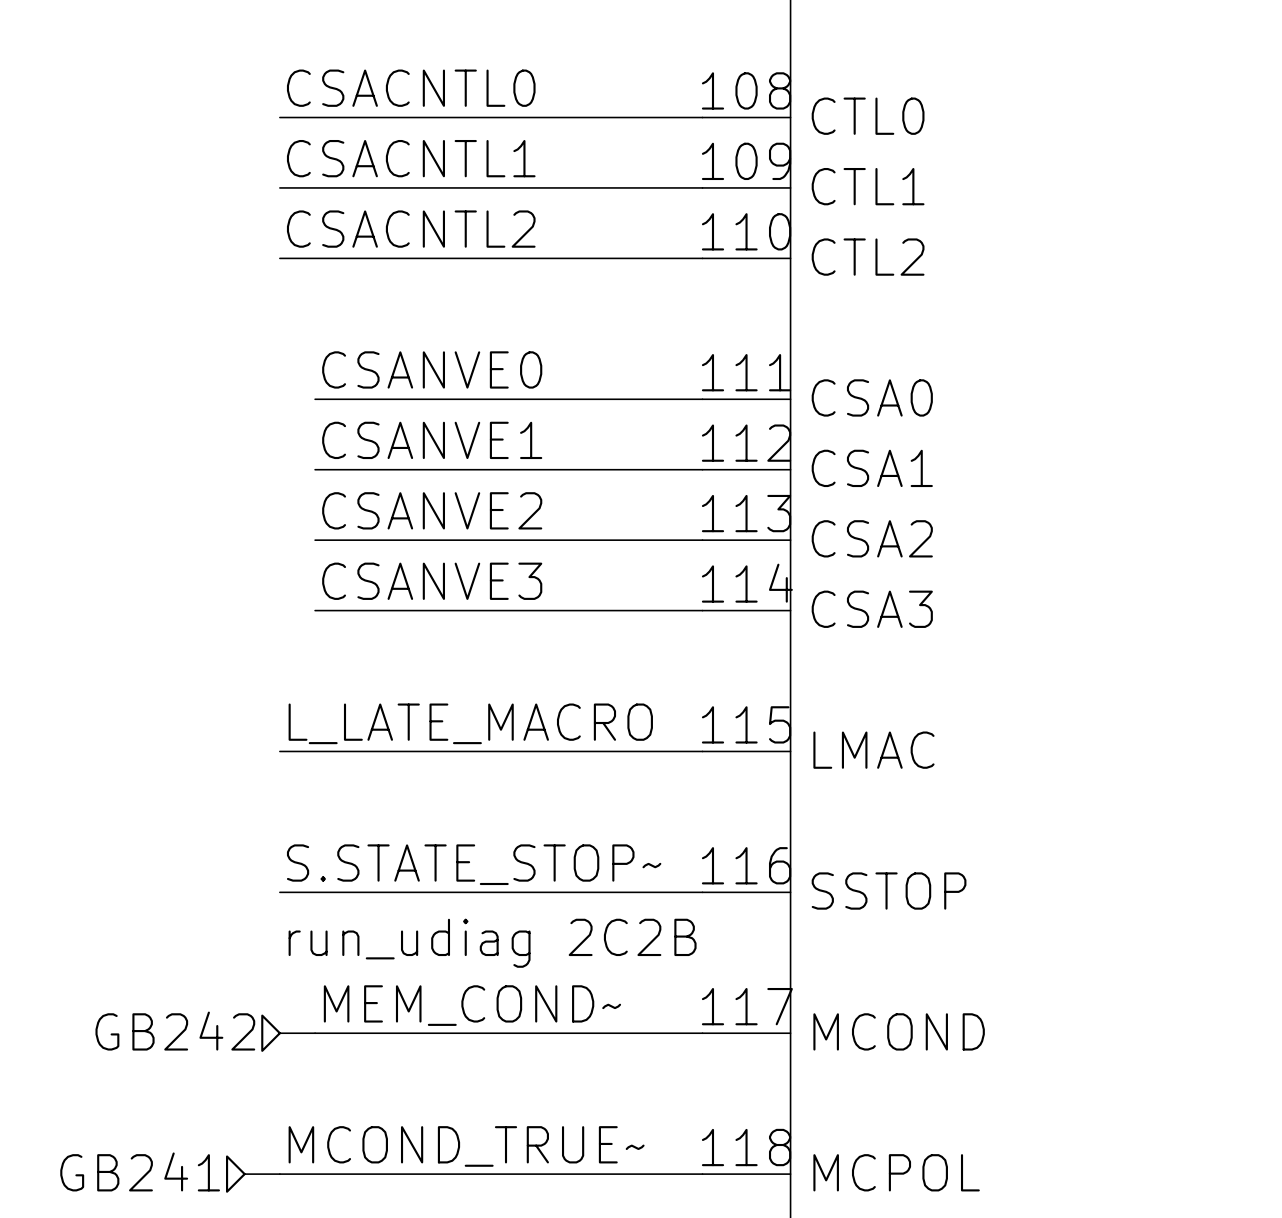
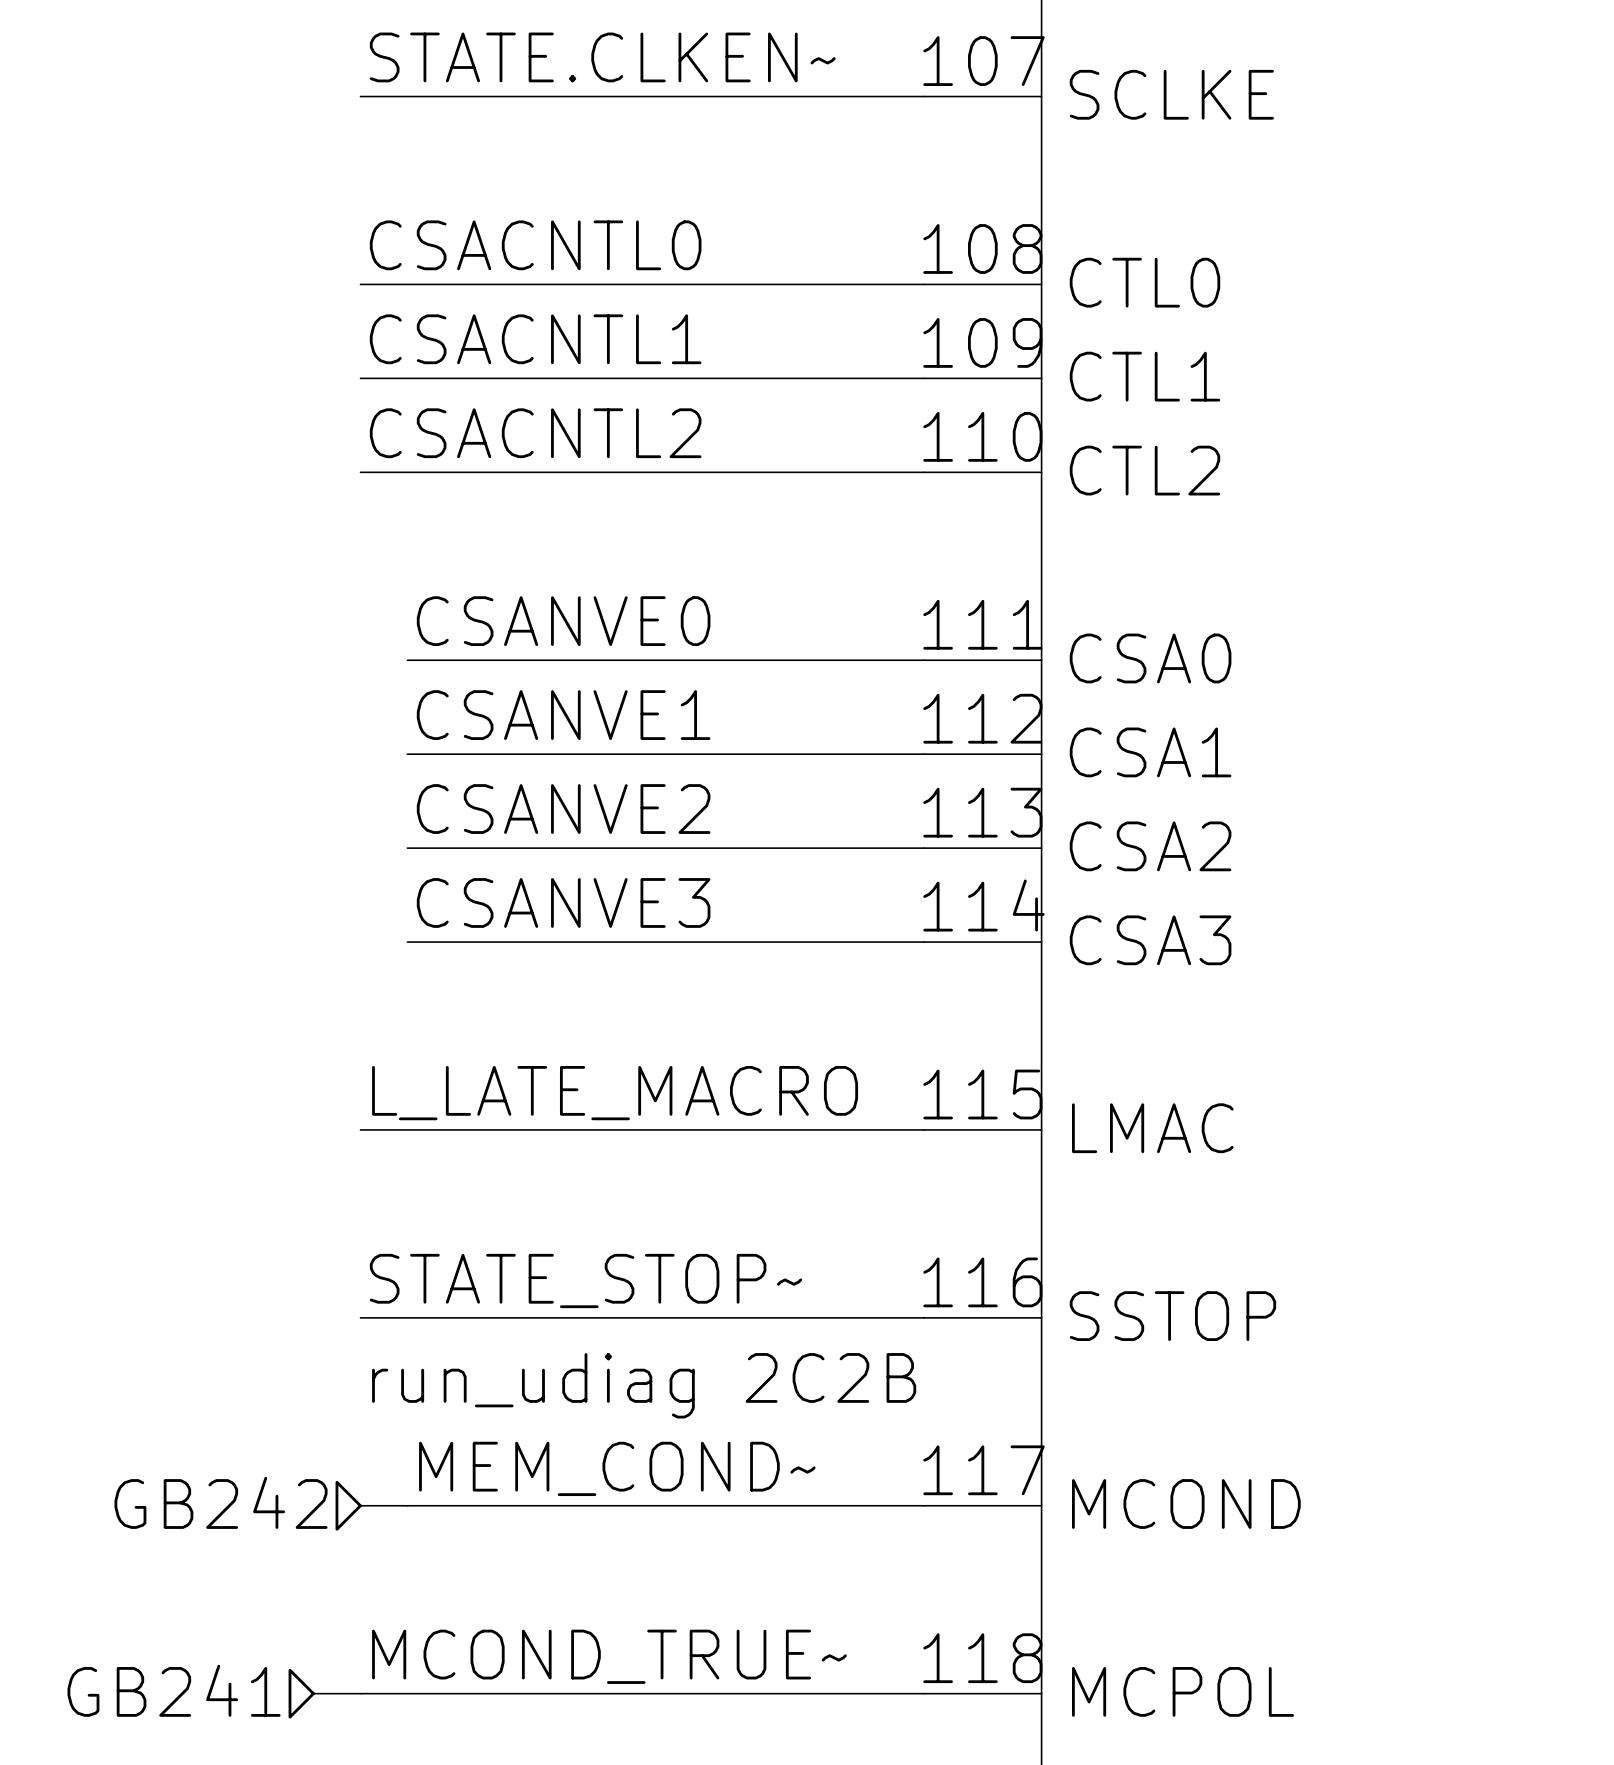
label: S.STATE_STOP~ (474, 864) -> STATE_STOP~ (585, 1281)

